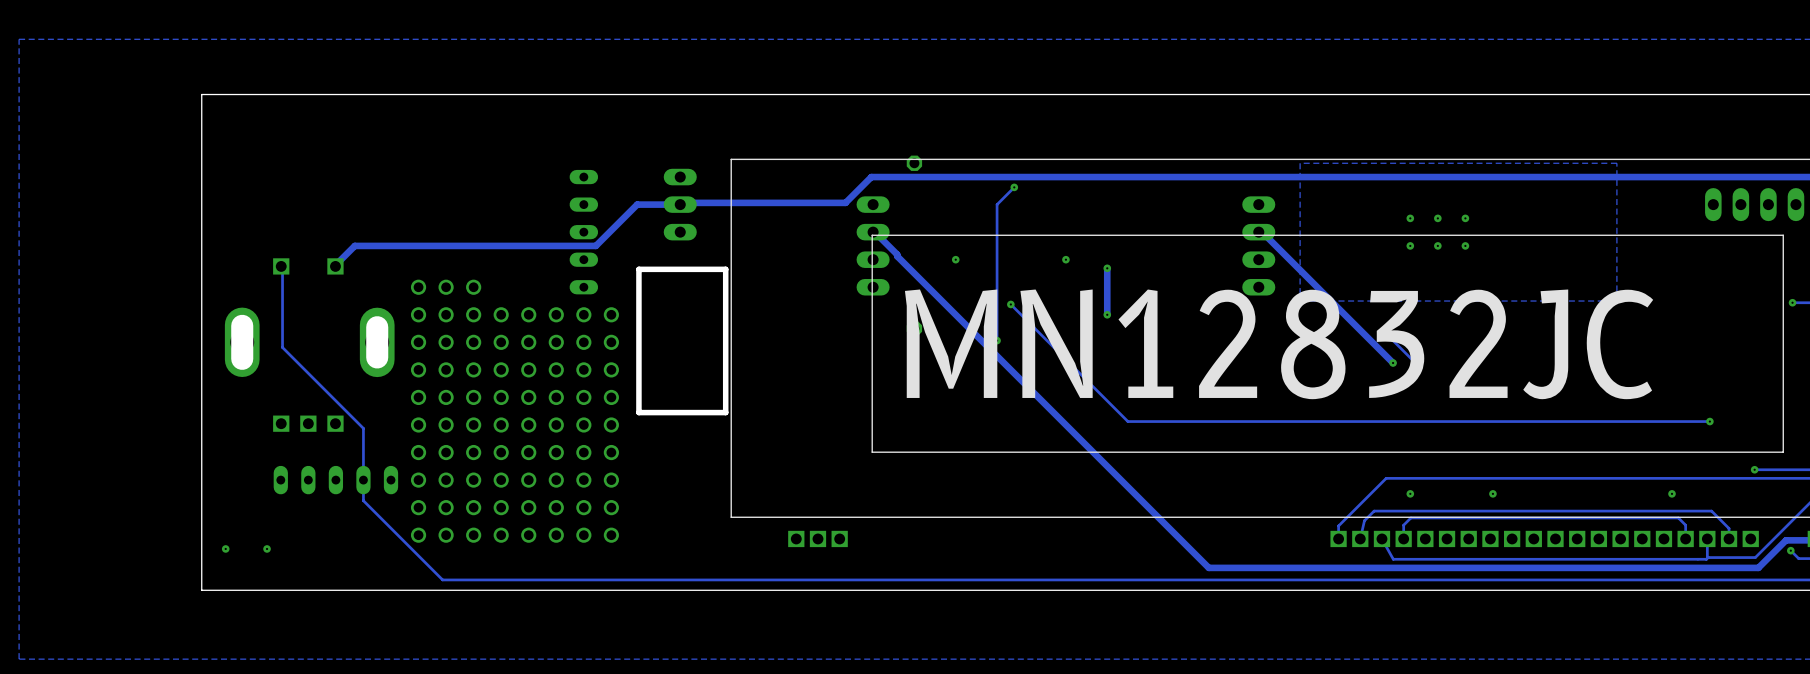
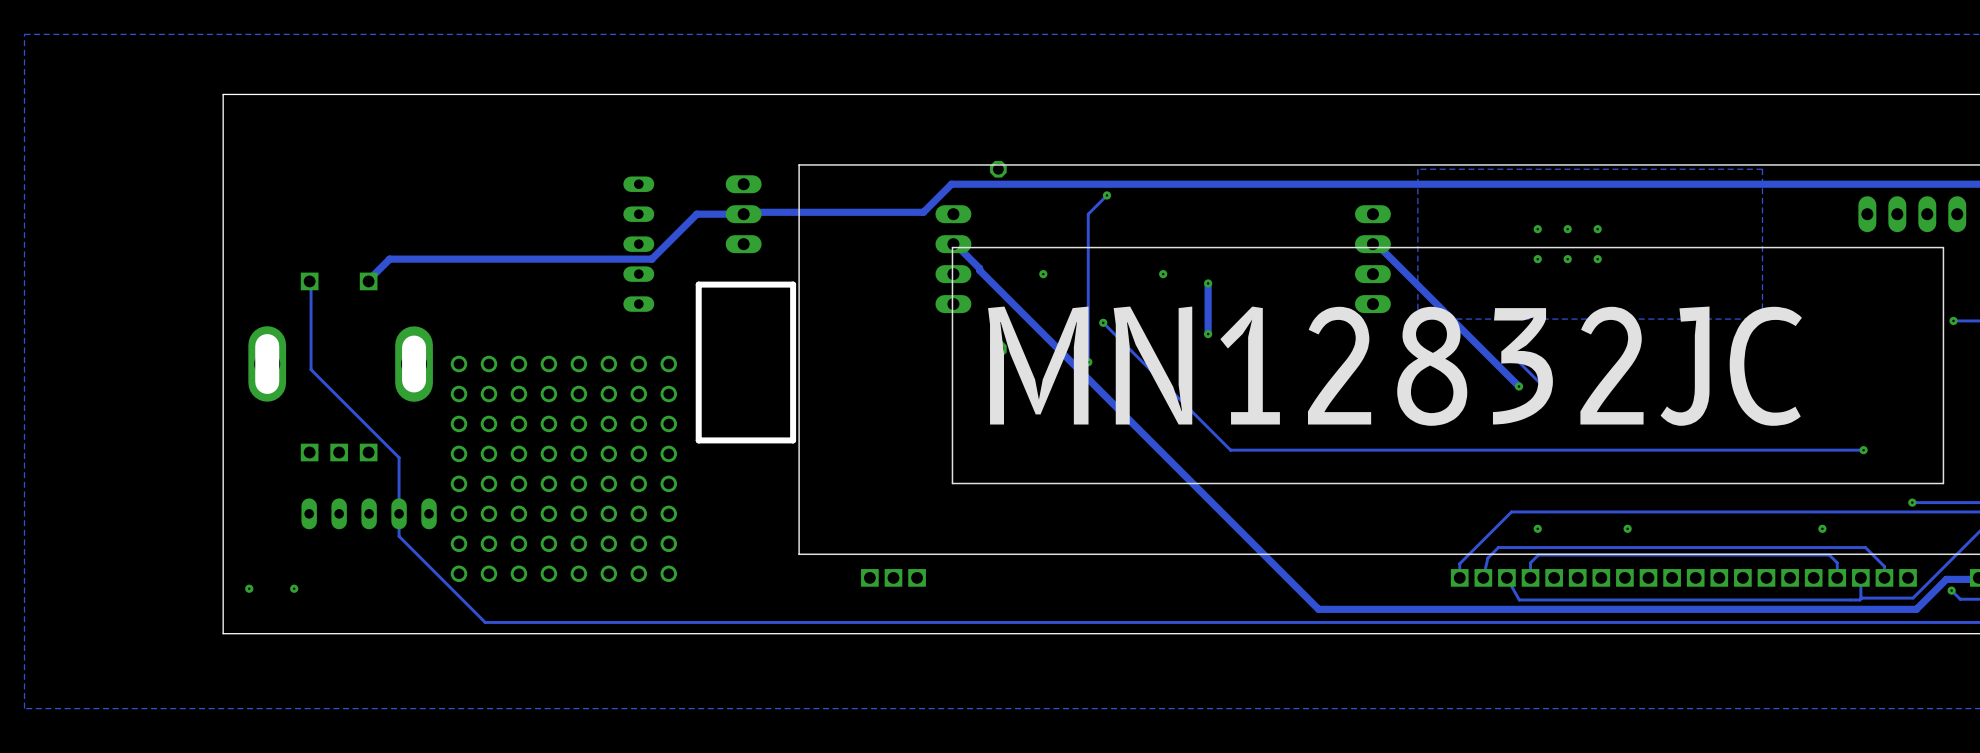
via: (418, 287) -> none
via: (446, 287) -> none
via: (473, 287) -> none
via: (418, 314) -> none
via: (446, 314) -> none
via: (473, 314) -> none
via: (501, 314) -> none
via: (528, 314) -> none
via: (556, 314) -> none
via: (583, 314) -> none
via: (611, 314) -> none

